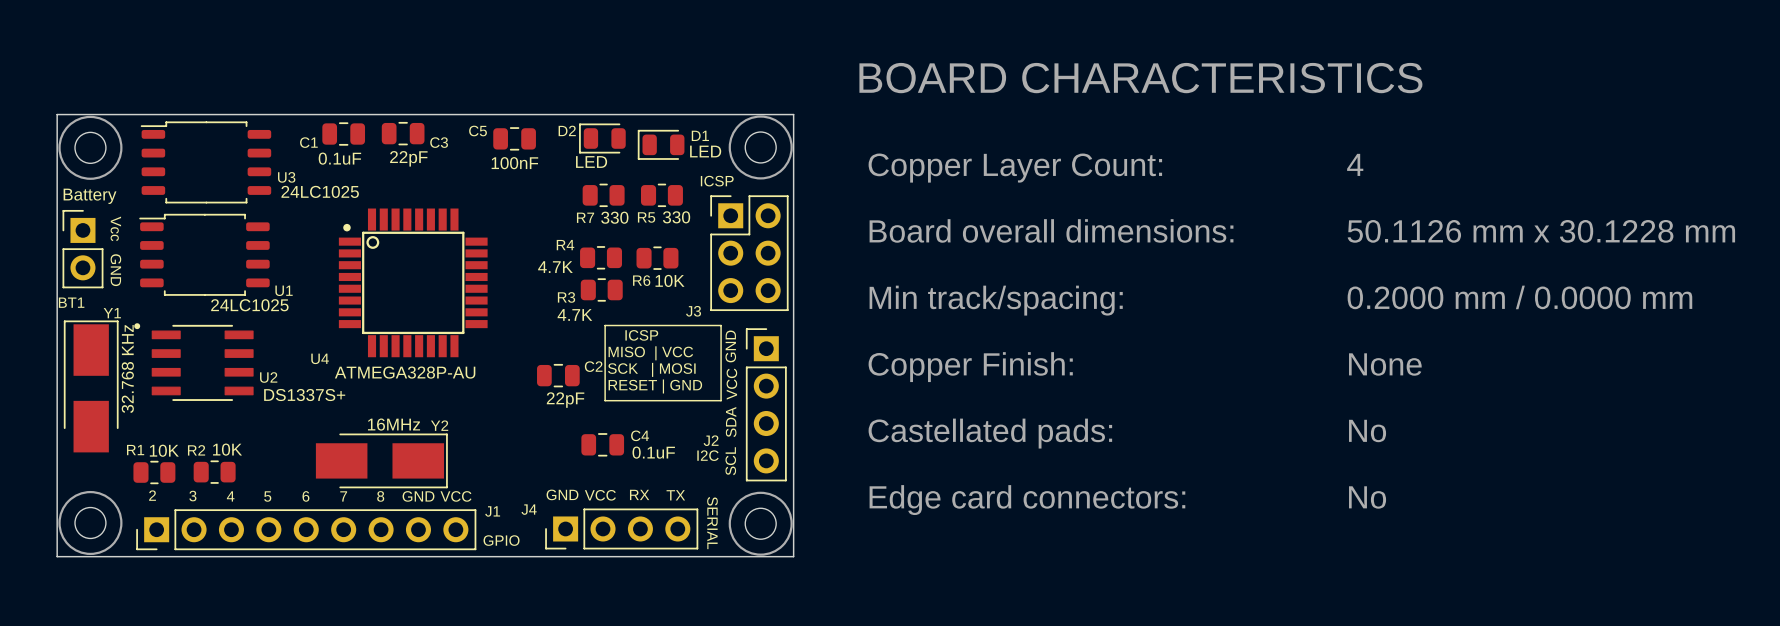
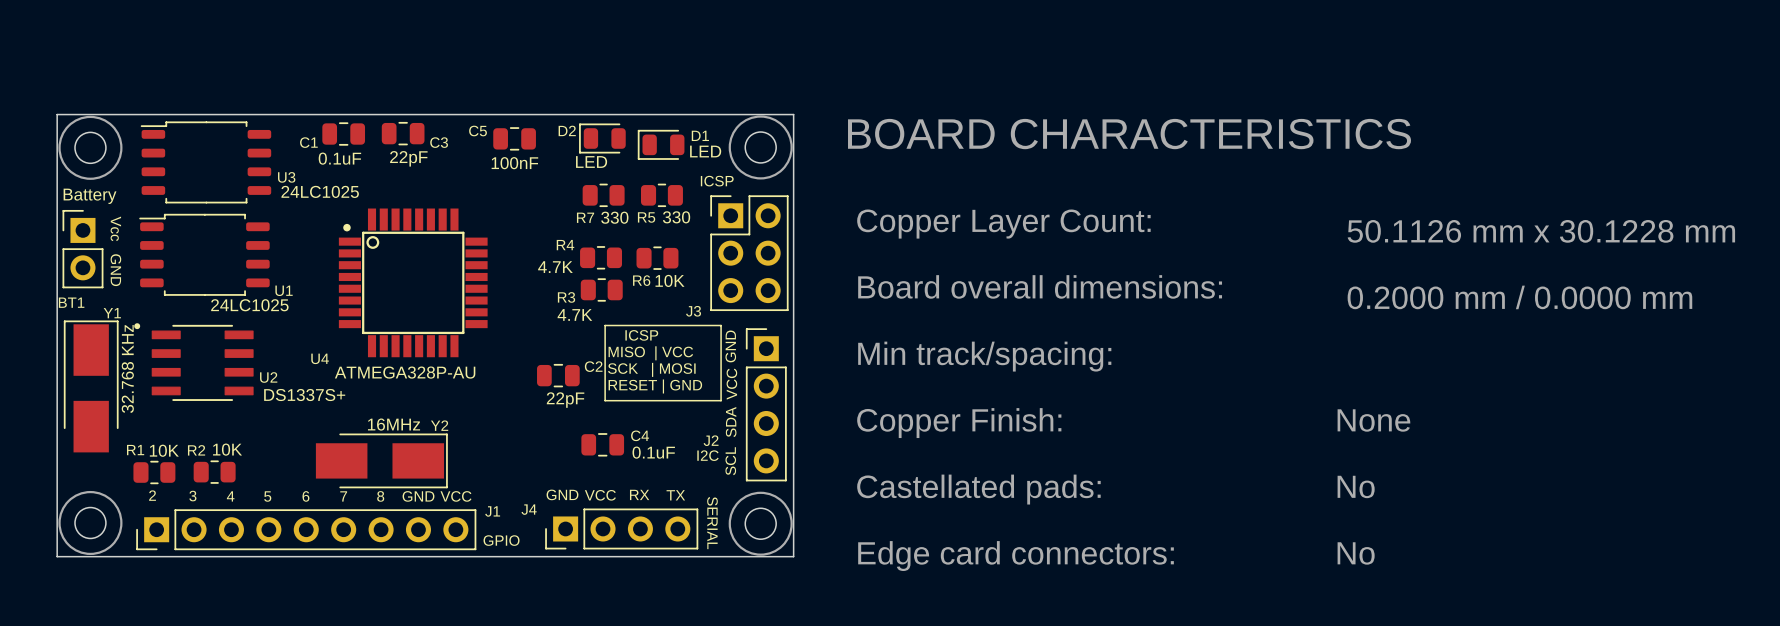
text position: BOARD CHARACTERISTICS (1140, 78) -> BOARD CHARACTERISTICS (1129, 134)
text: 4 (1355, 164) -> none
text position: Copper Layer Count: (1015, 168) -> Copper Layer Count: (1003, 224)
text position: Board overall dimensions: (1051, 230) -> Board overall dimensions: (1040, 286)
text position: Min track/spacing: (996, 300) -> Min track/spacing: (984, 356)
text position: None (1385, 364) -> None (1373, 420)
text position: Copper Finish: (970, 367) -> Copper Finish: (959, 423)
text: No (1367, 430) -> none
text position: Castellated pads: (990, 433) -> Castellated pads: (978, 489)
text position: No (1367, 497) -> No (1356, 486)
text position: Edge card connectors: (1027, 500) -> Edge card connectors: (1016, 556)
text: none -> No (1356, 553)

